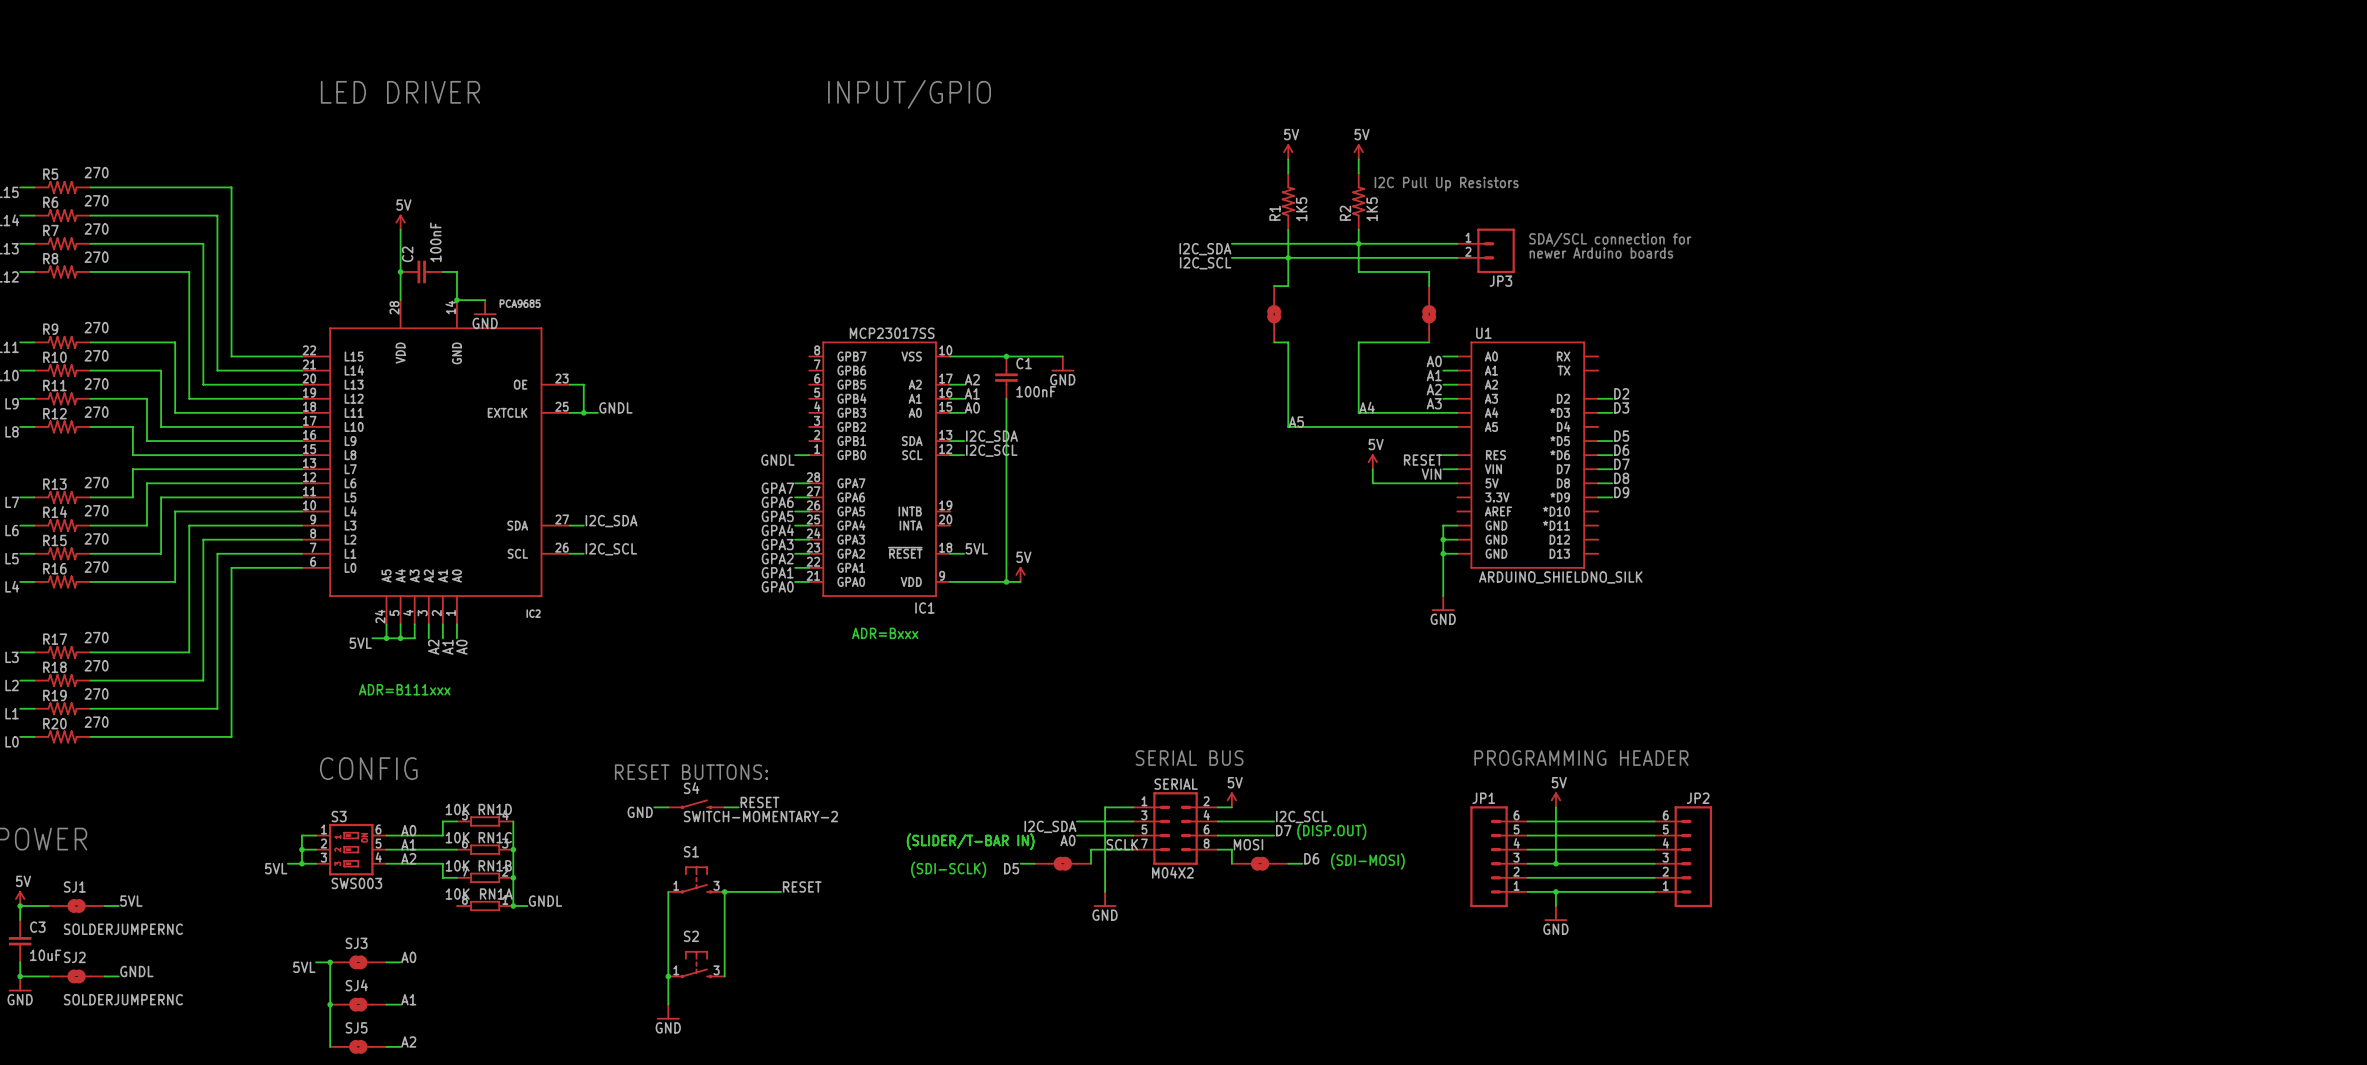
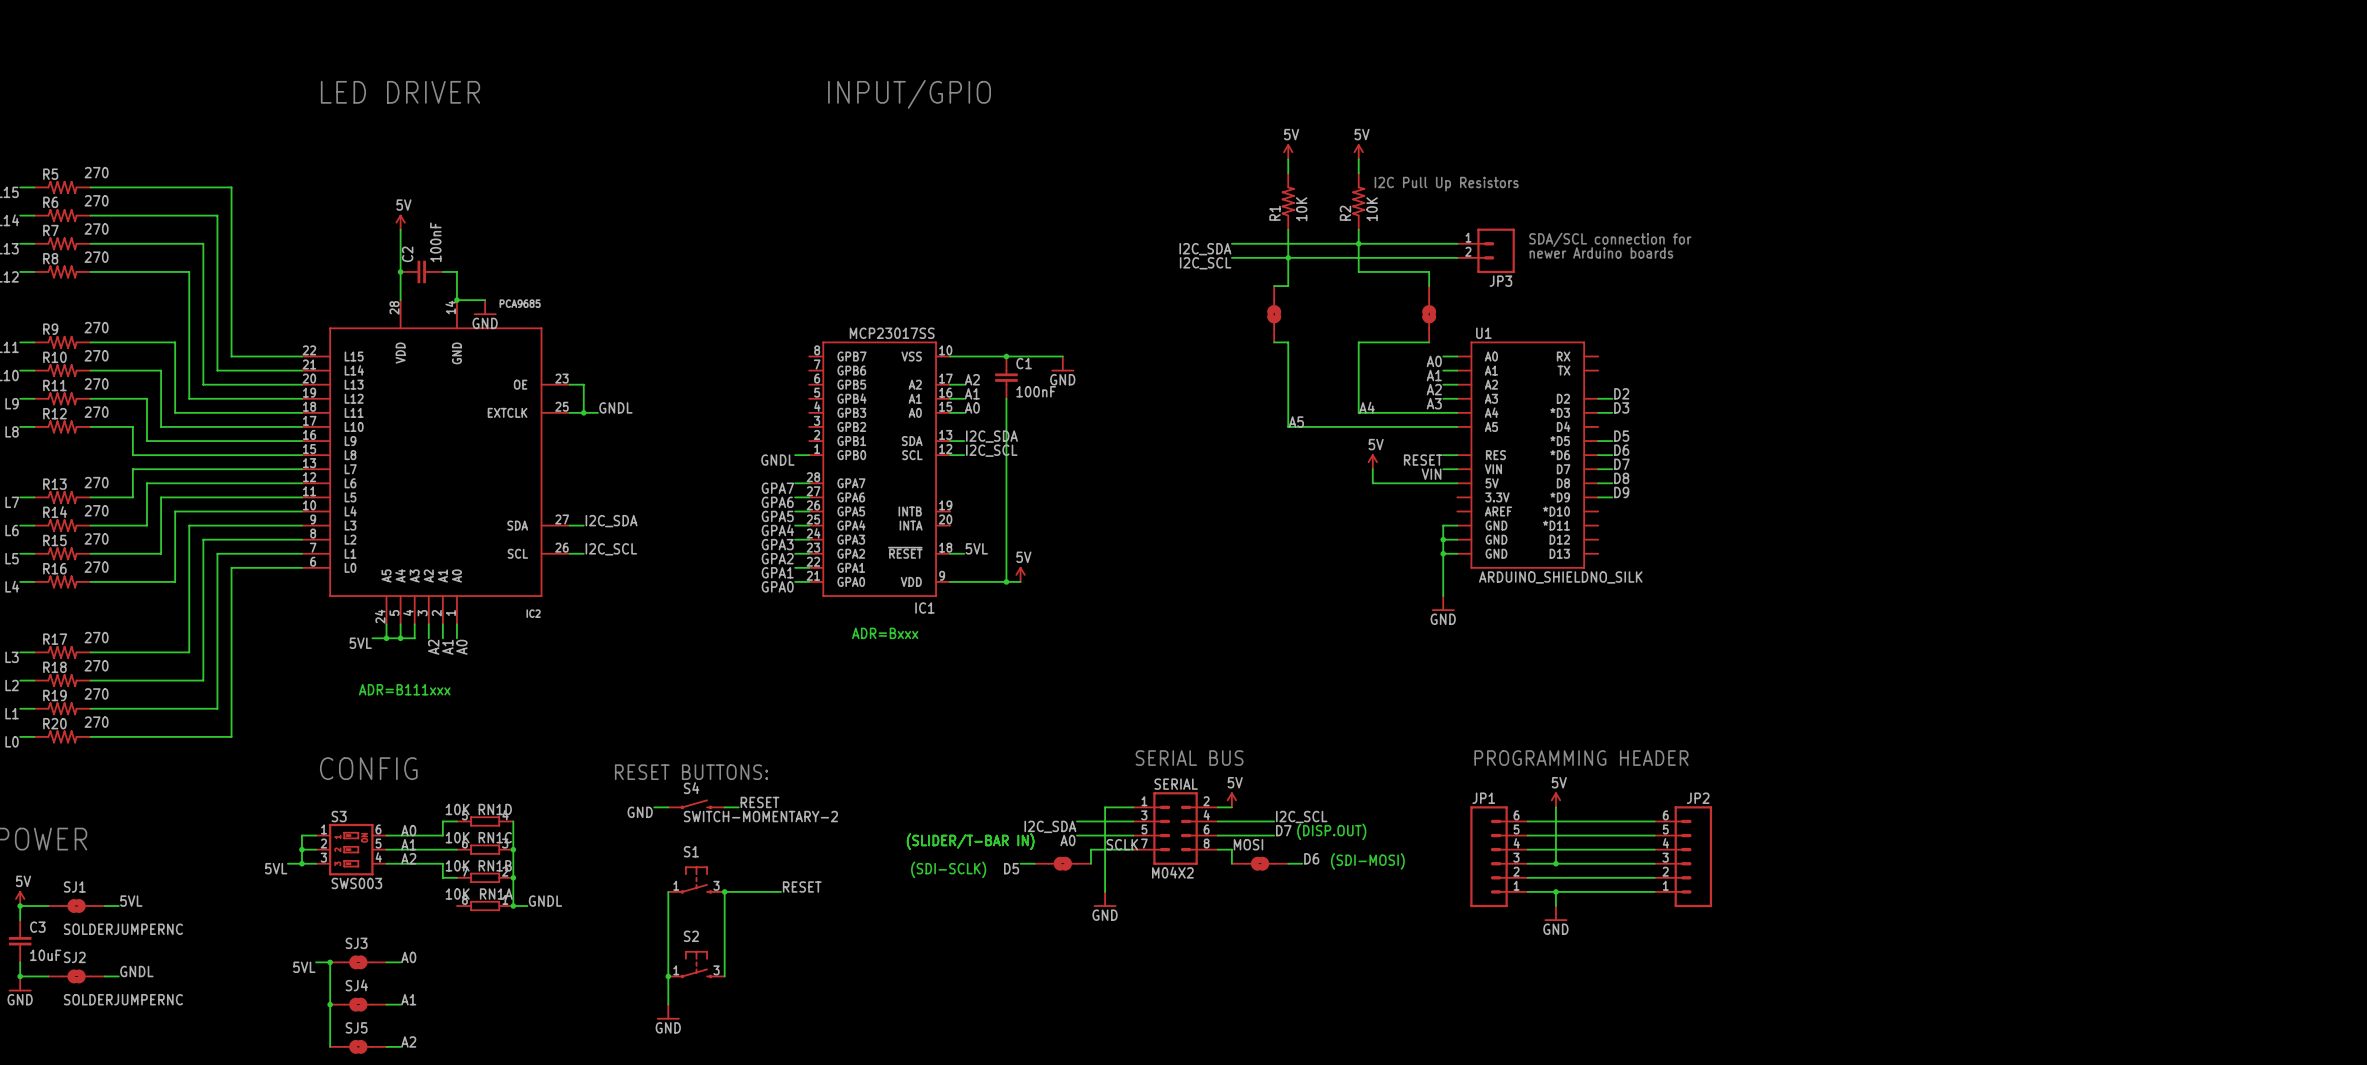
R1 value: 1K5 (1301, 209) -> 10K (1301, 209)
R2 value: 1K5 (1372, 209) -> 10K (1372, 209)

